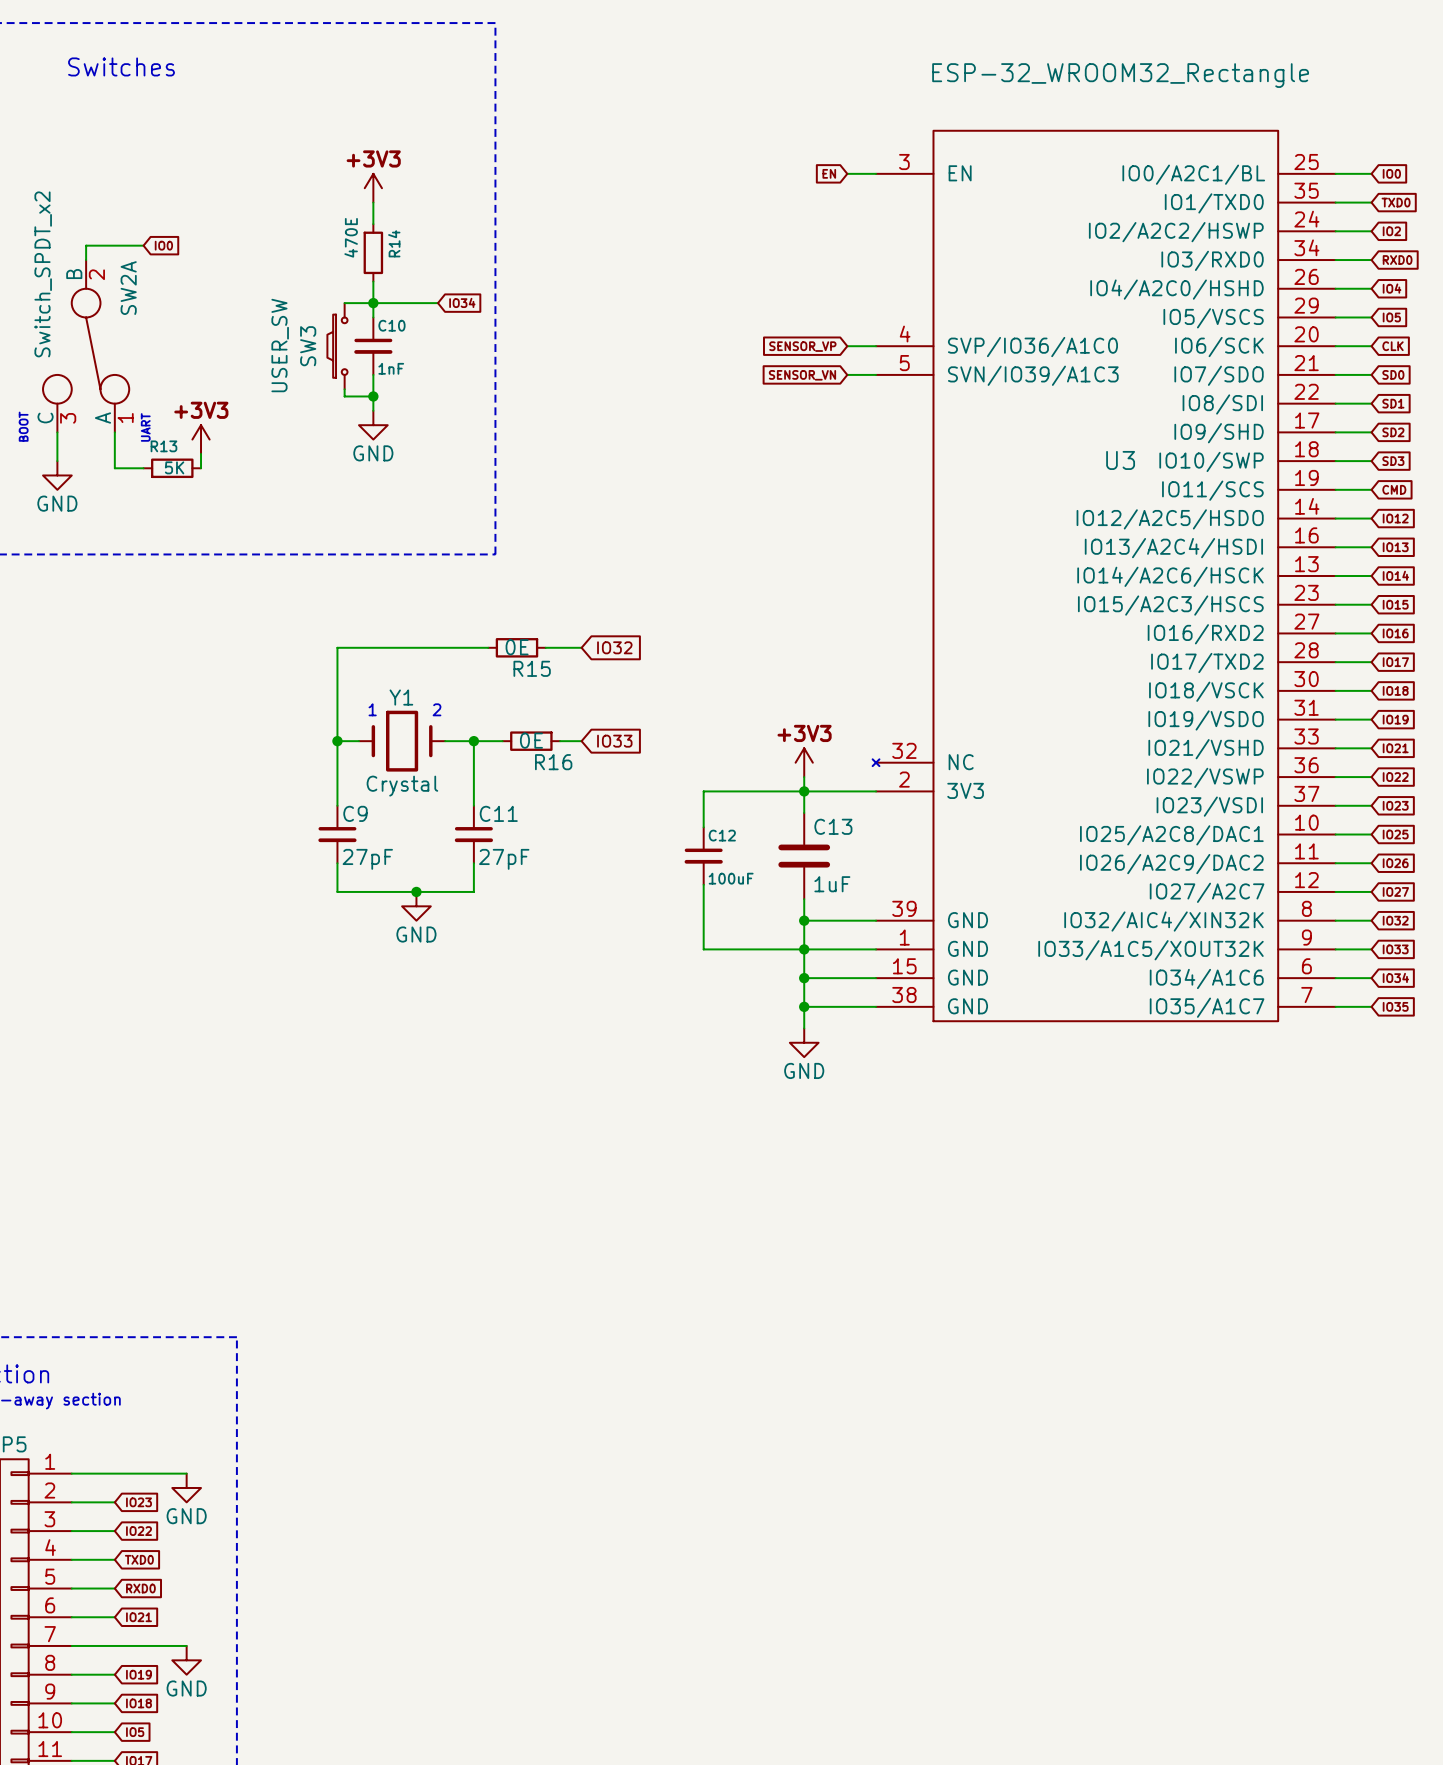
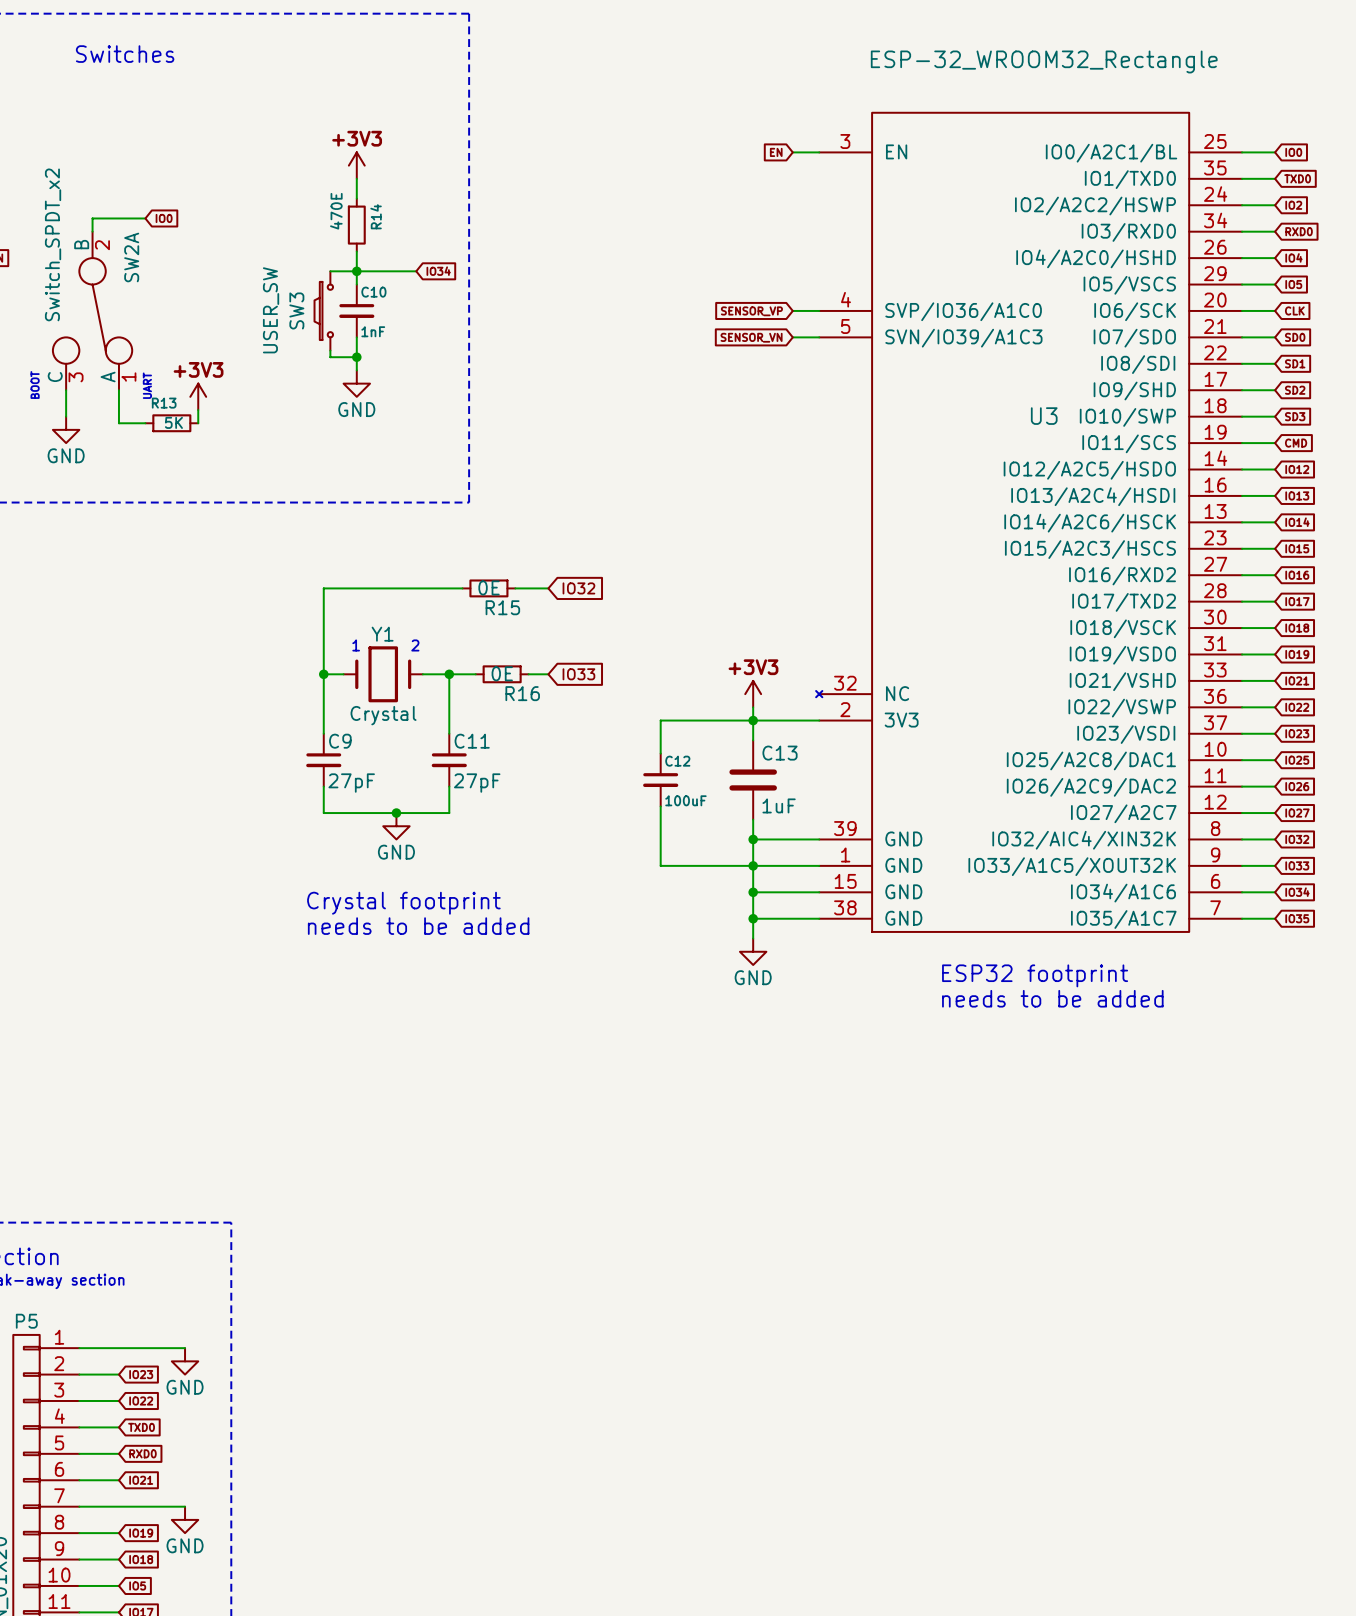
text: none -> Crystal footprint (403, 903)
text: none -> needs to be added (418, 926)
text: none -> ESP32 footprint (1035, 975)
text: none -> needs to be added (1052, 998)

